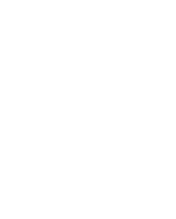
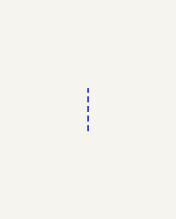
line: none -> (88, 88) (88, 131)

